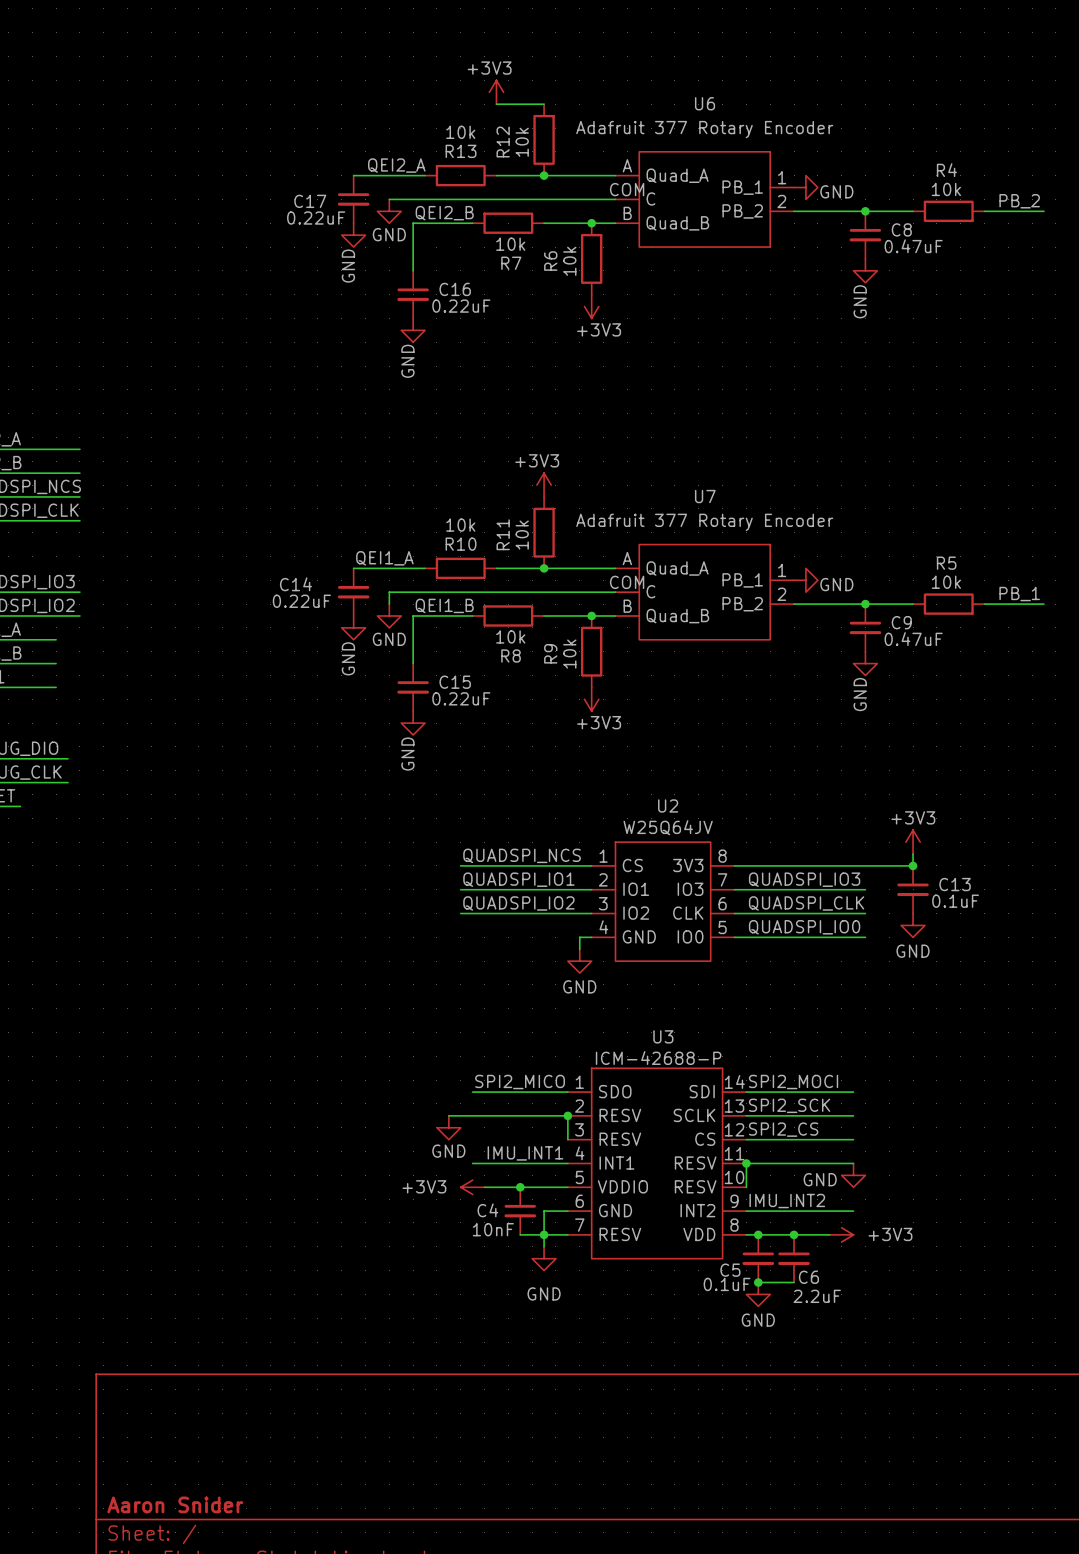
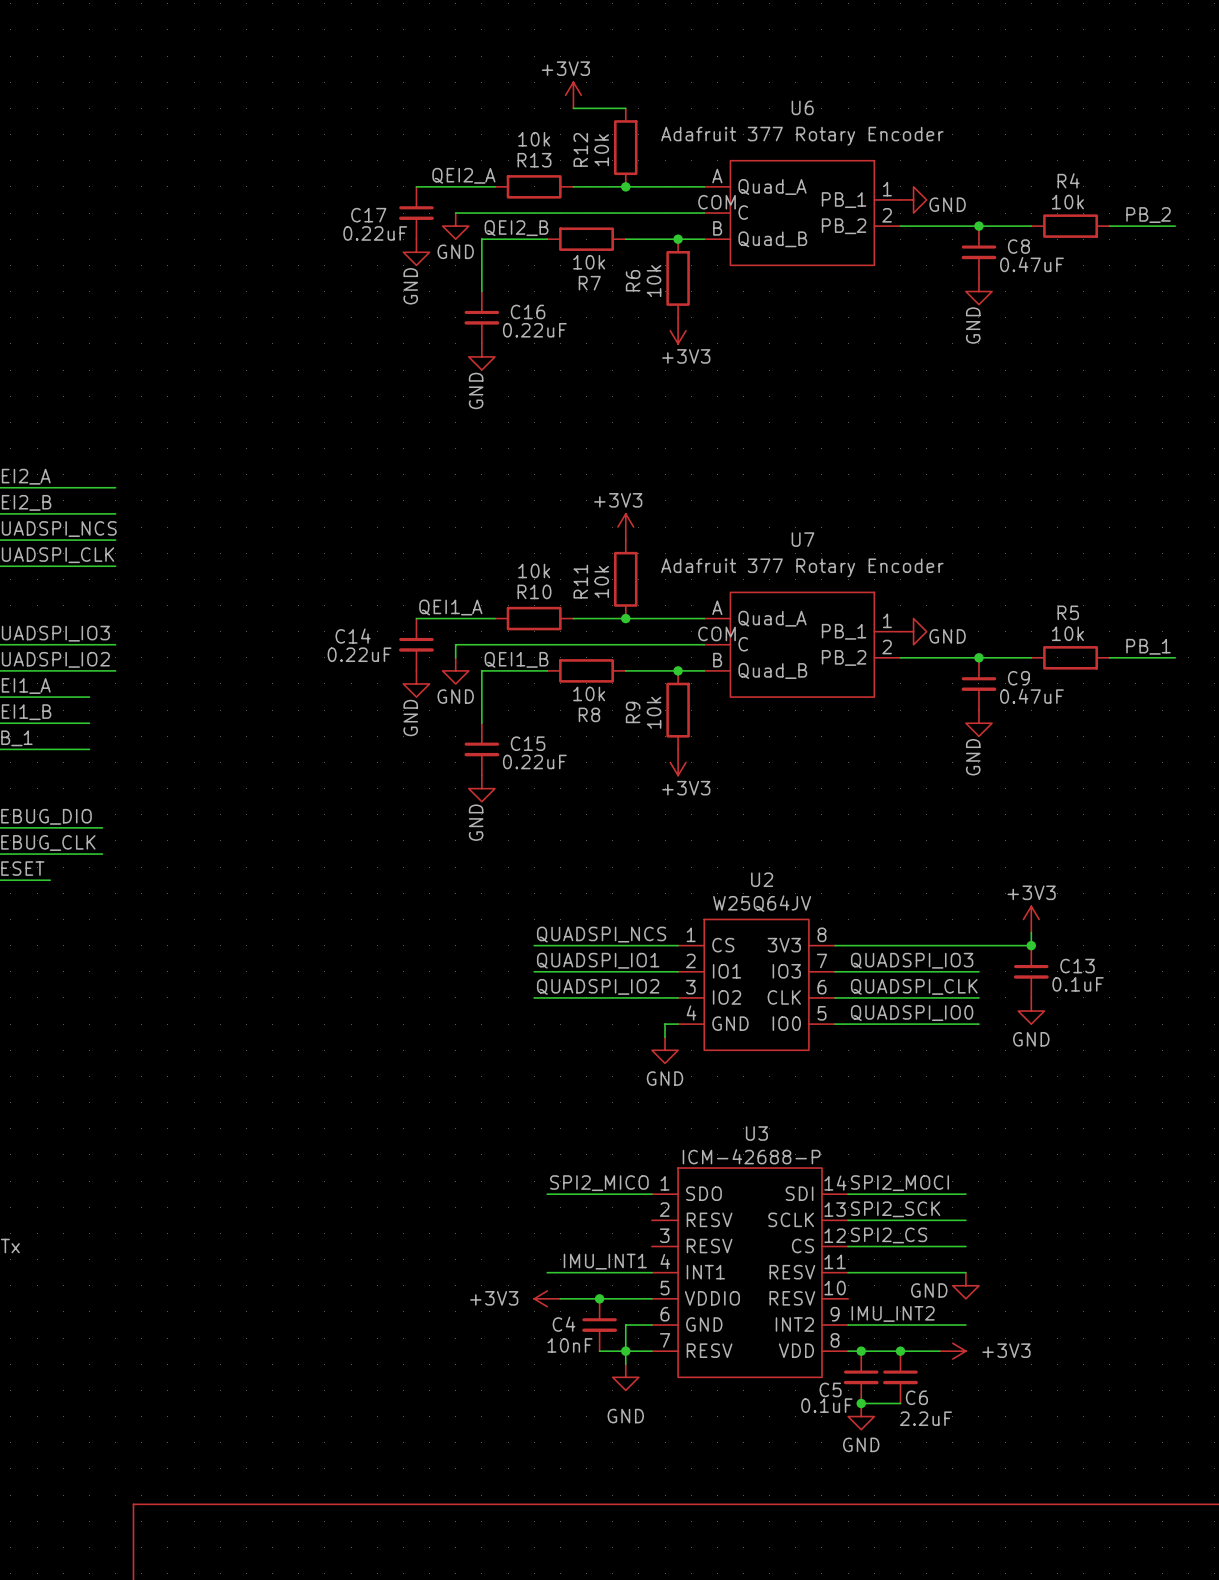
wire: (448, 1115) (567, 1115) (567, 1139) -> none
junction: (567, 1115) -> none
power symbol: GND (448, 1127) -> none
wire: (746, 1163) (746, 1187) -> none
junction: (746, 1163) -> none

